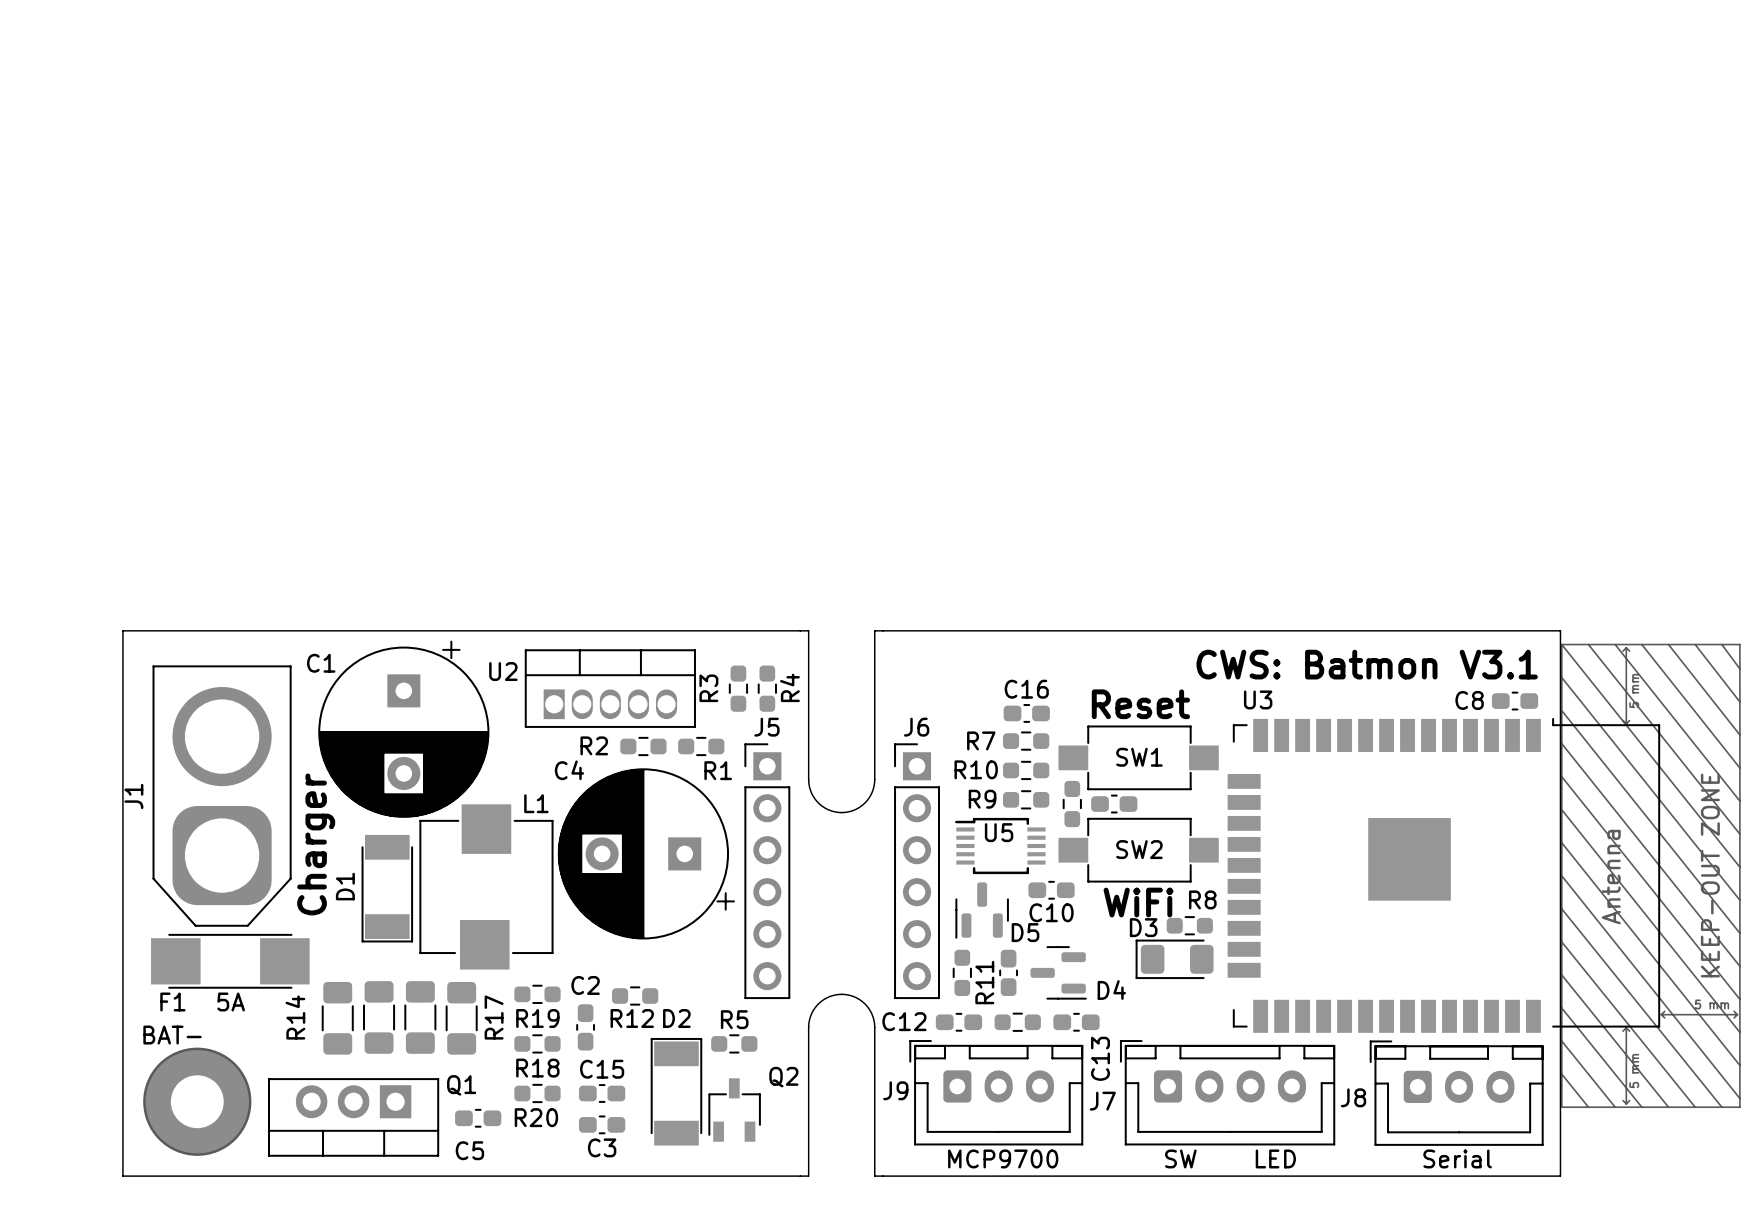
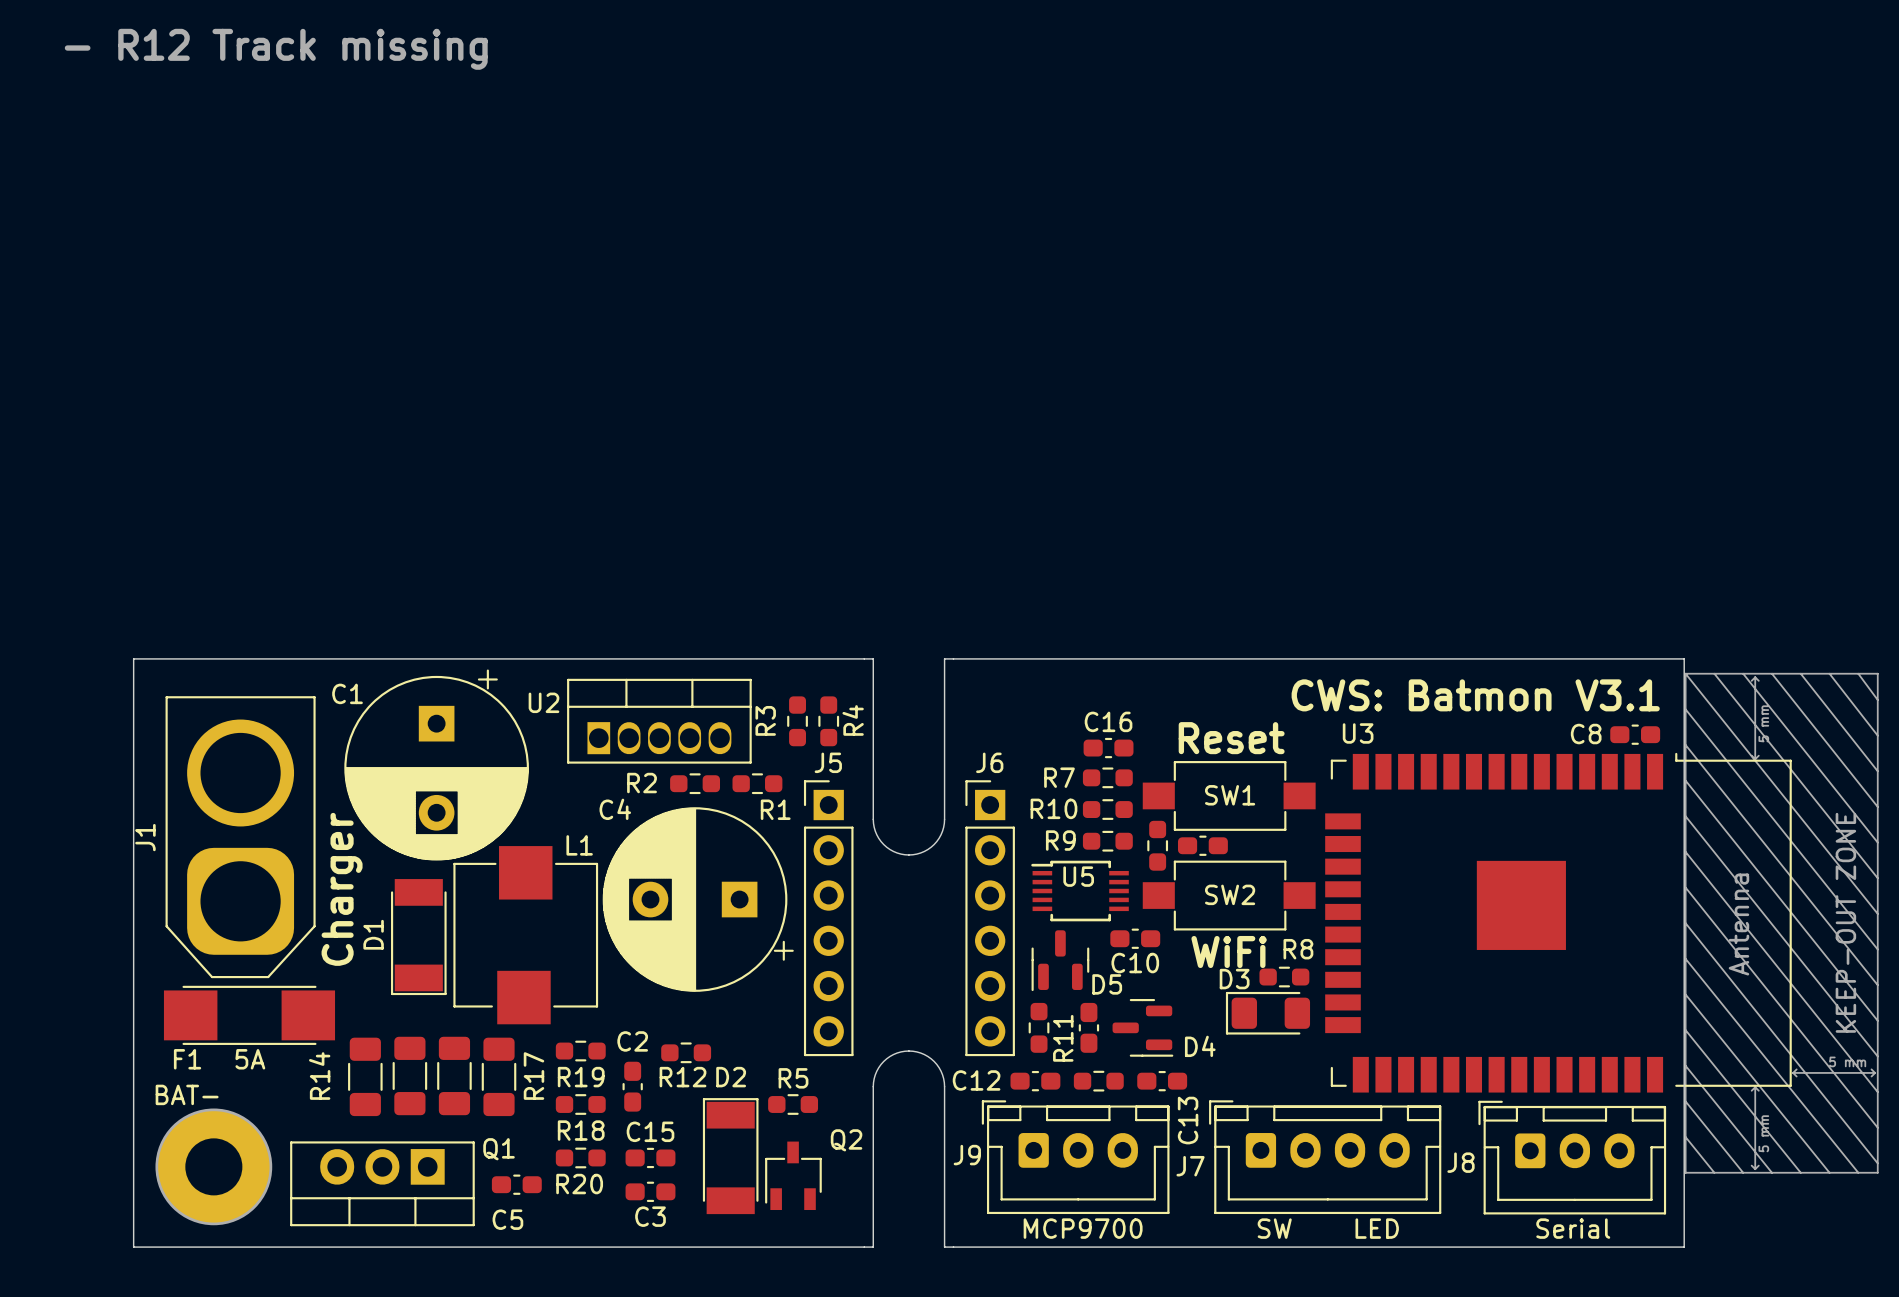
text: none -> - R12 Track missing (276, 49)

